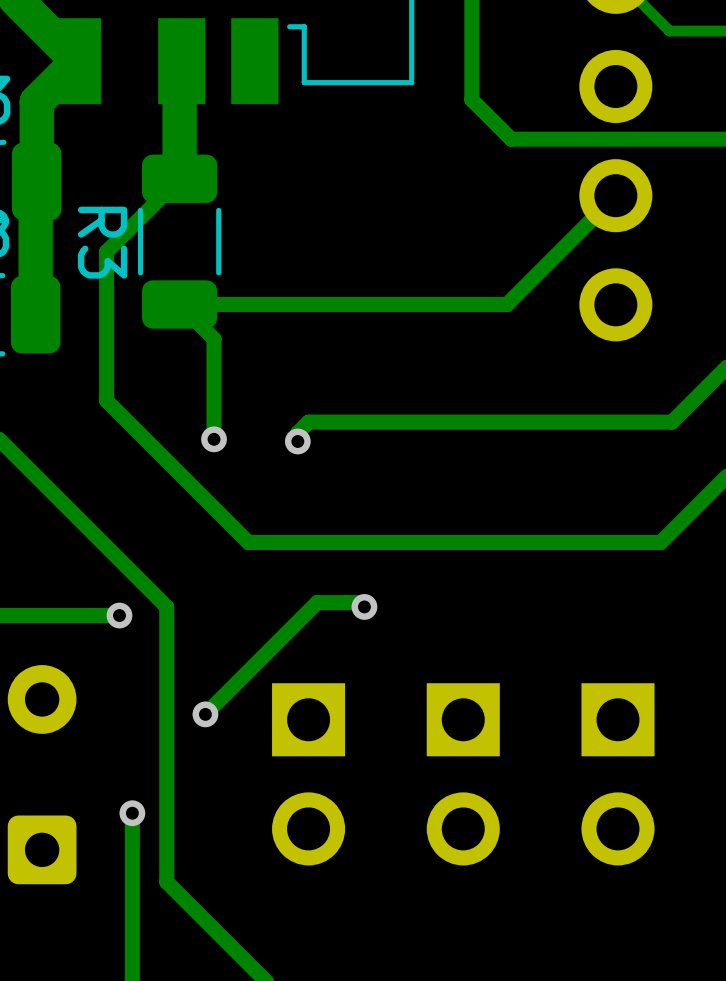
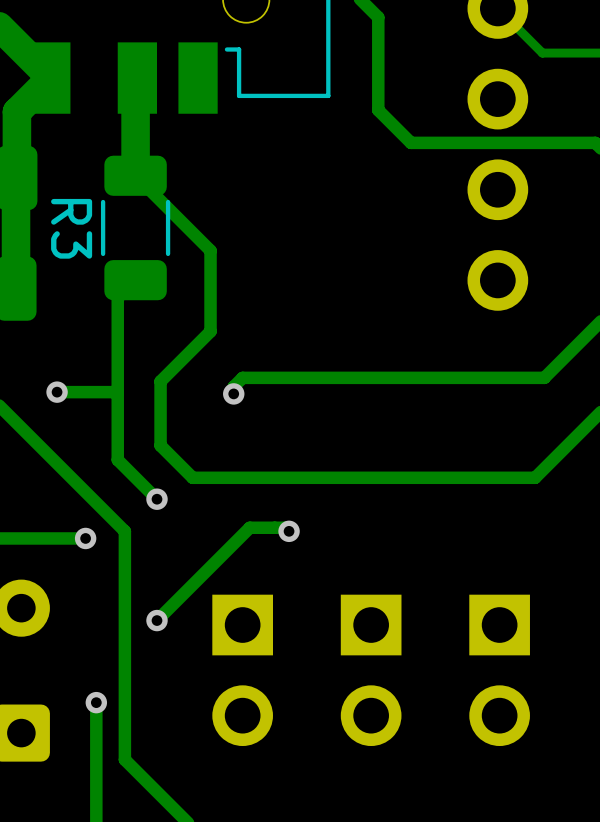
track: (179, 178) (106, 251) (106, 400) (209, 503) -> (135, 175) (210, 250) (210, 331) (160, 381) (160, 445)
track: (615, 195) (507, 304) (179, 304) (214, 338) (214, 439) -> none
track: none -> (135, 280) (117, 298) (117, 459) (157, 499)
via: none -> (57, 392)
track: none -> (117, 392) (57, 392)
via: (214, 439) -> none
via: none -> (157, 499)

